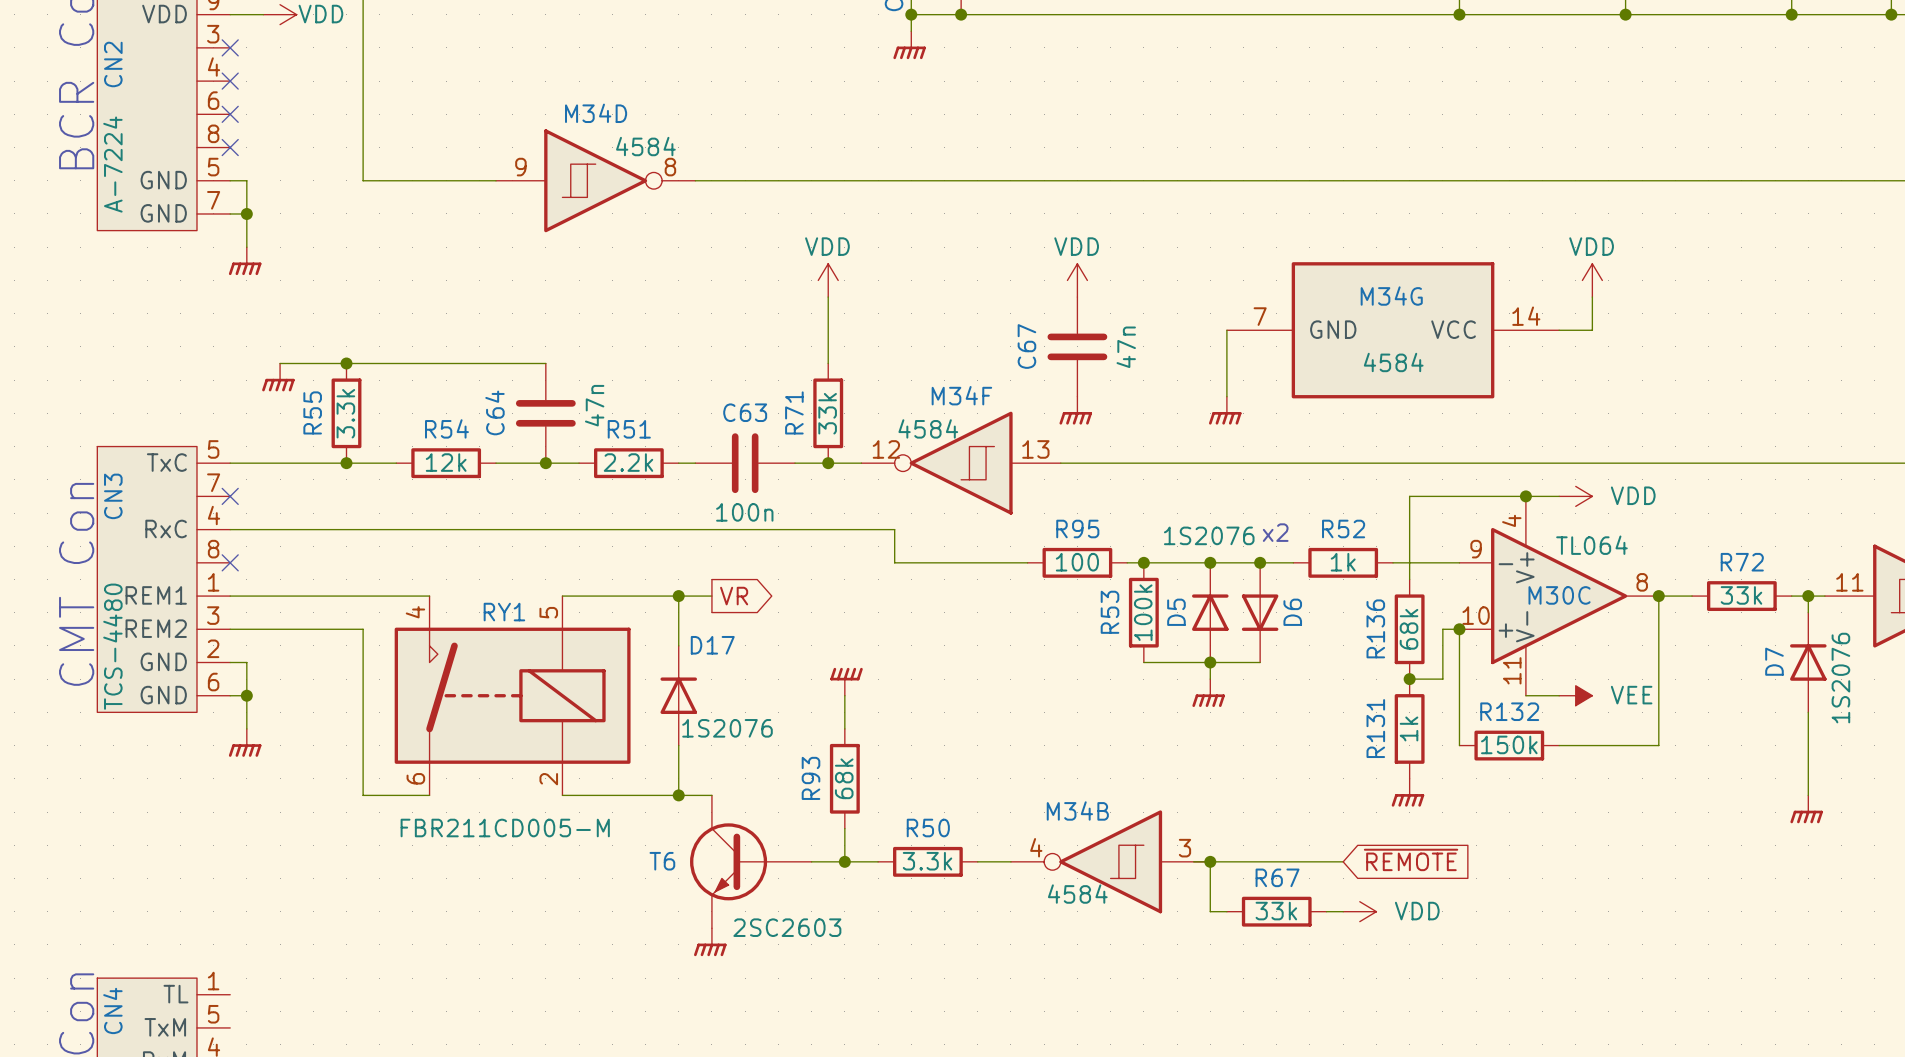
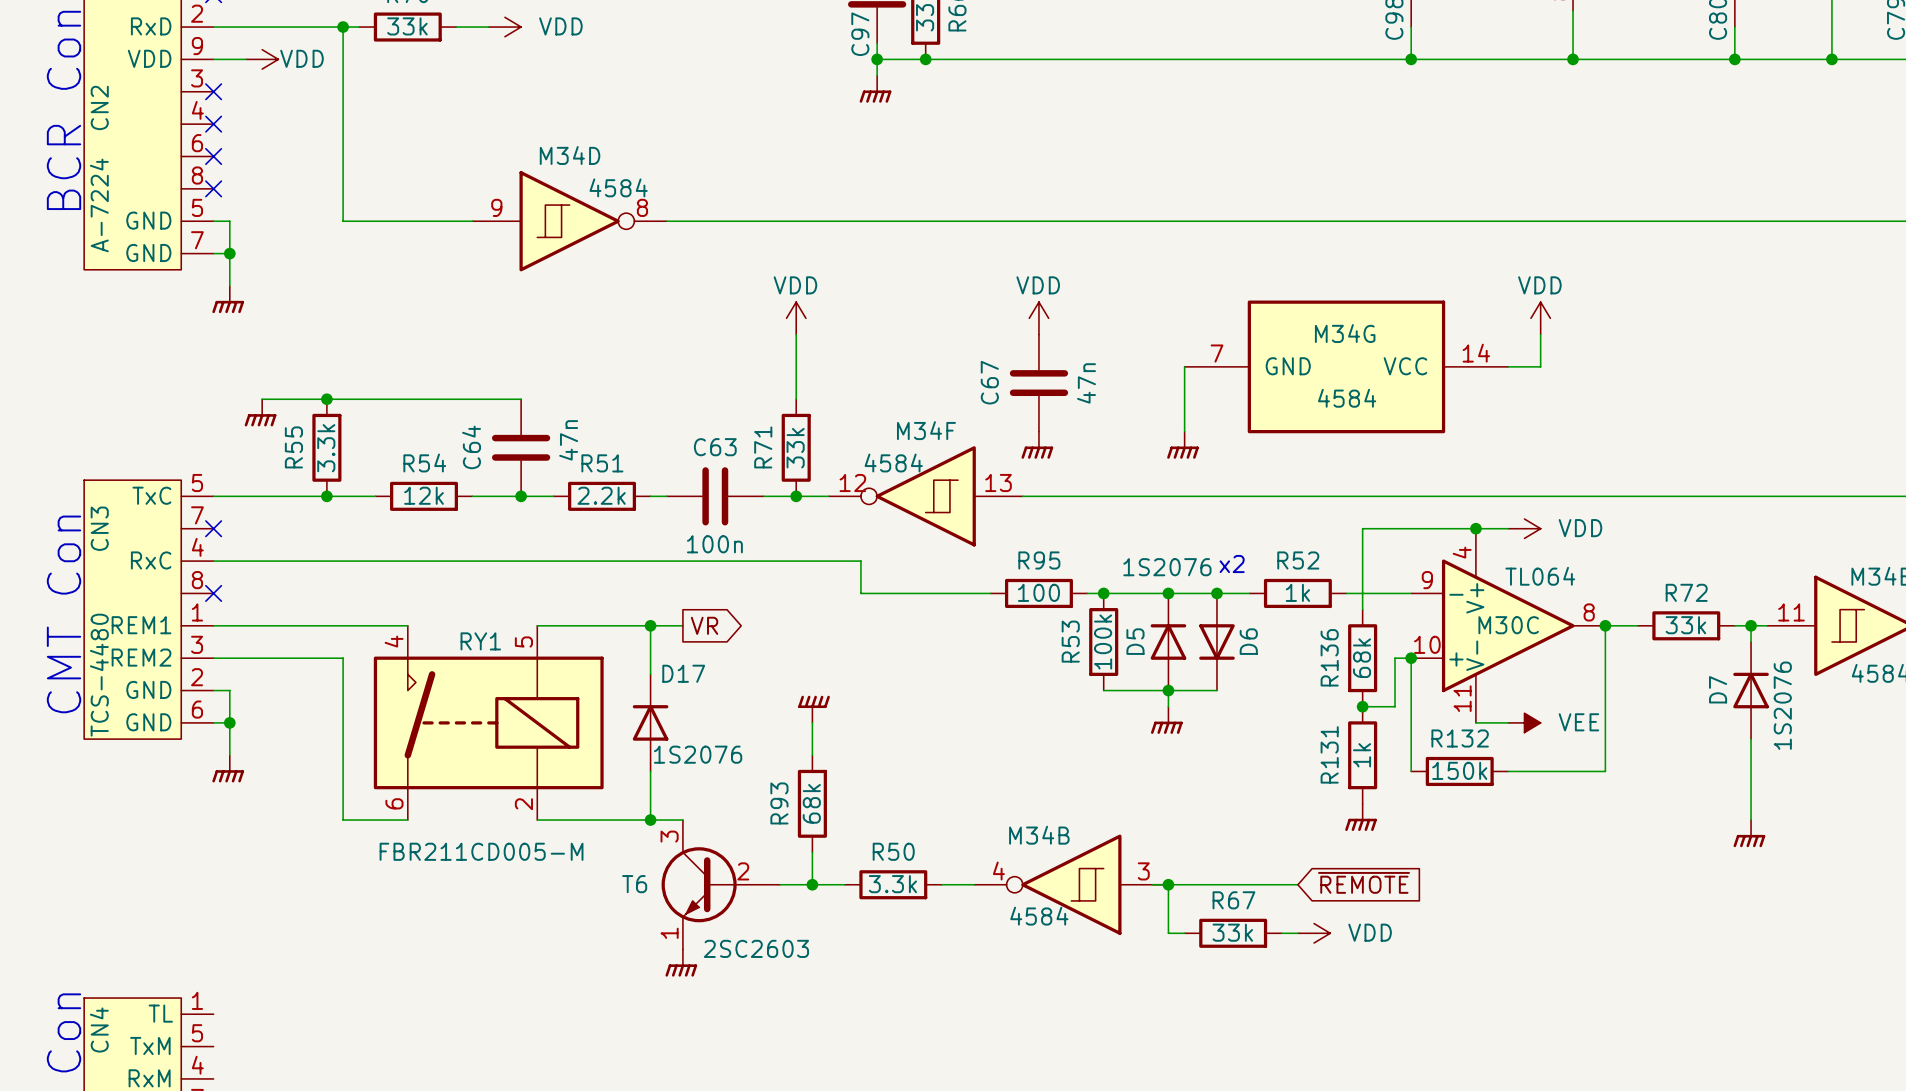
T6 pin number: none -> 3 (669, 836)
T6 pin number: none -> 2 (743, 871)
T6 pin number: none -> 1 (669, 933)

